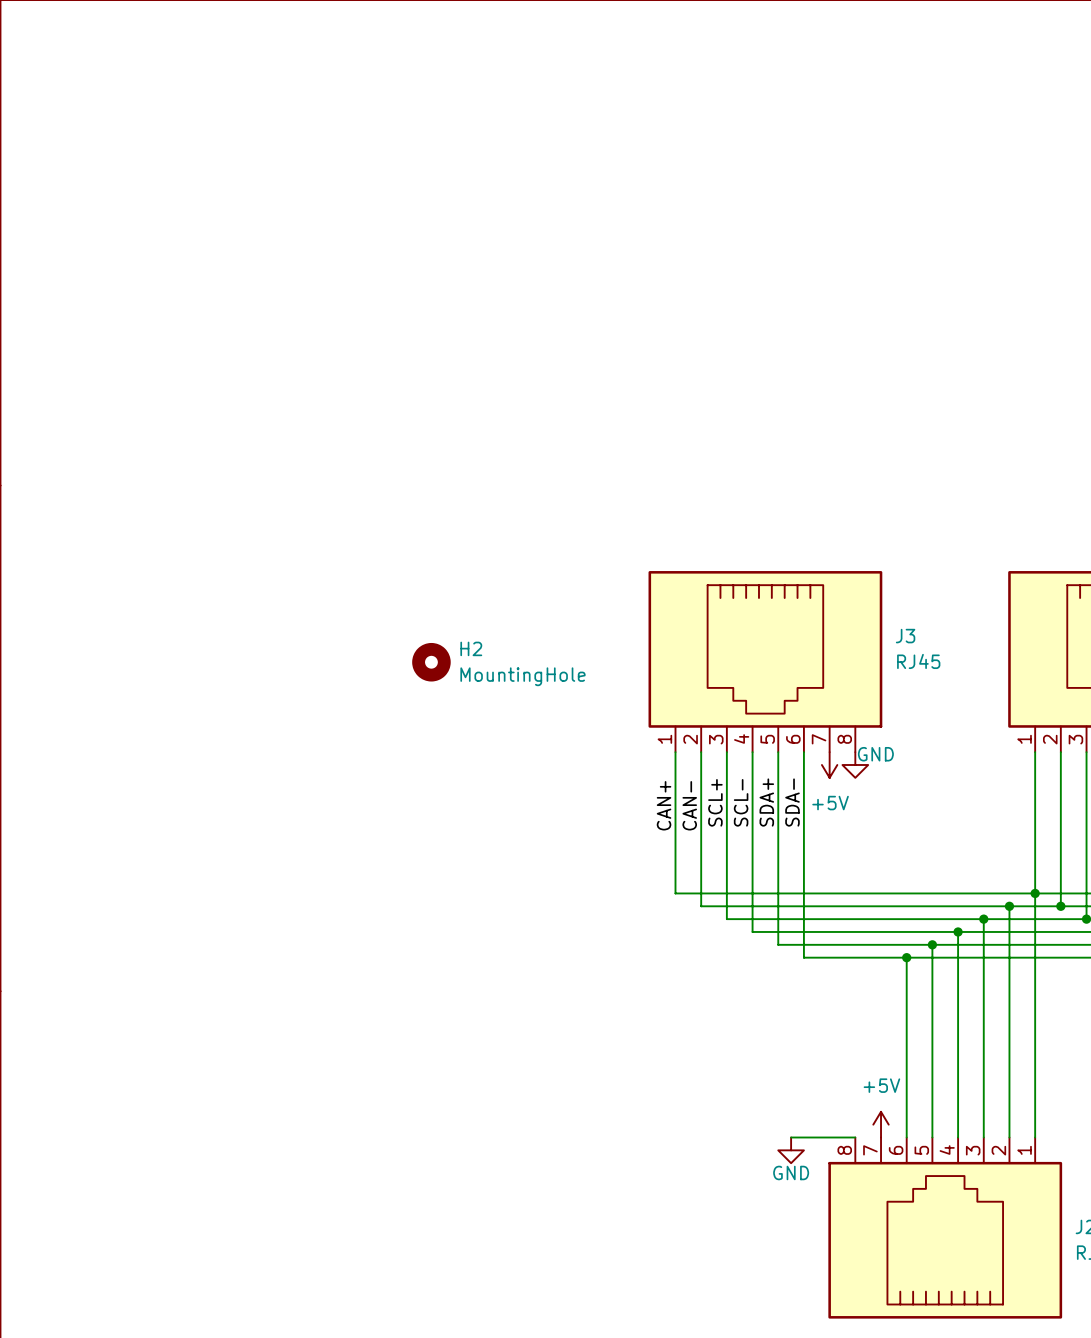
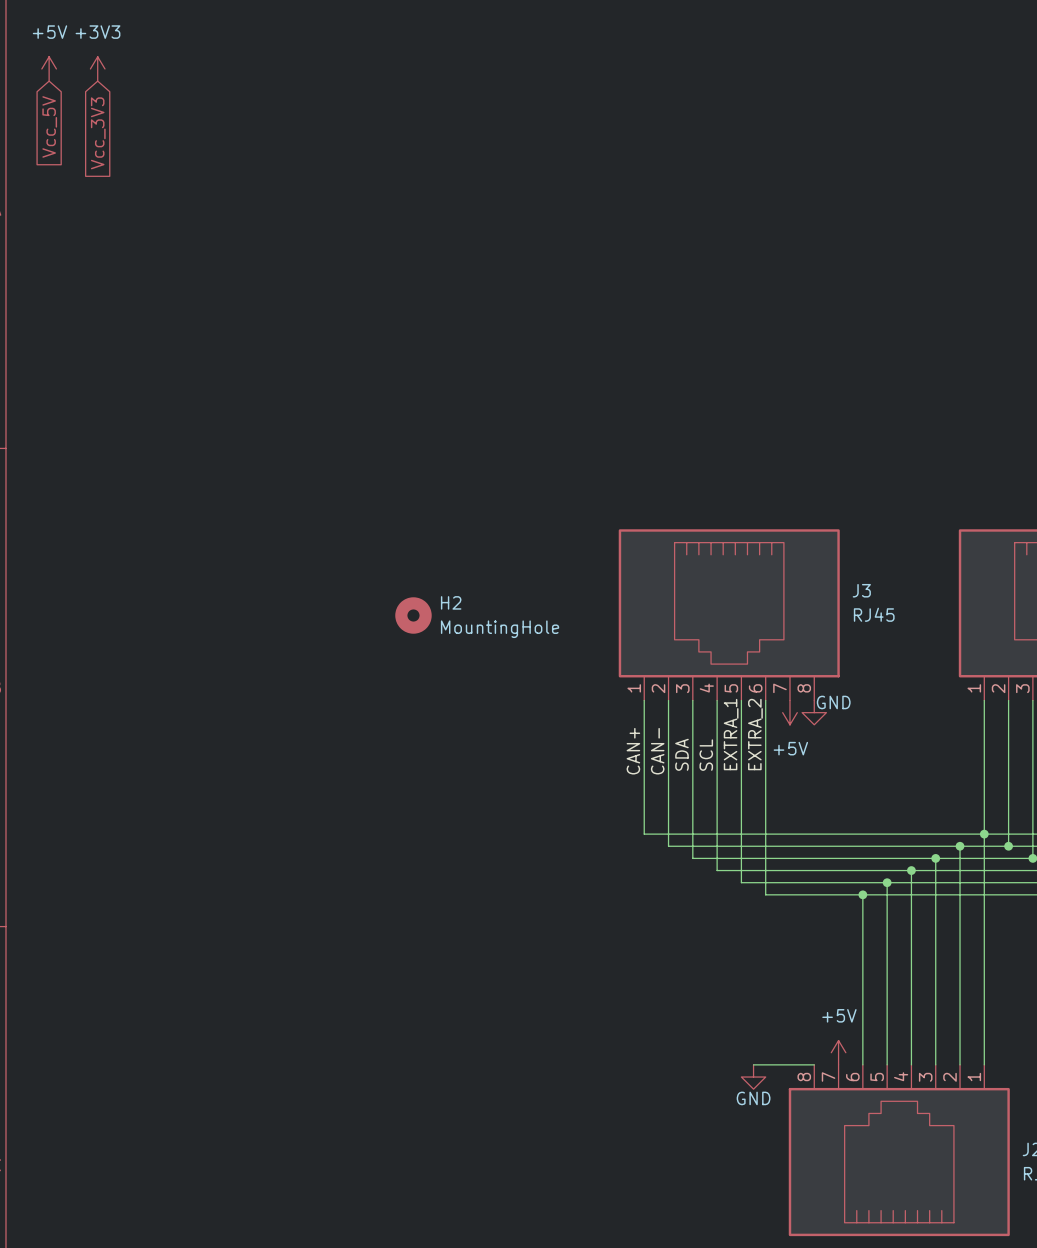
power symbol: none -> +5V (49, 68)
power symbol: none -> +3V3 (97, 68)
global label: none -> Vcc_5V (49, 126)
global label: none -> Vcc_3V3 (98, 133)
label: SCL+ (715, 802) -> SDA (681, 754)
label: SCL- (741, 802) -> SCL (706, 755)
label: SDA+ (766, 802) -> EXTRA_1 (731, 734)
label: SDA- (792, 802) -> EXTRA_2 (755, 734)

